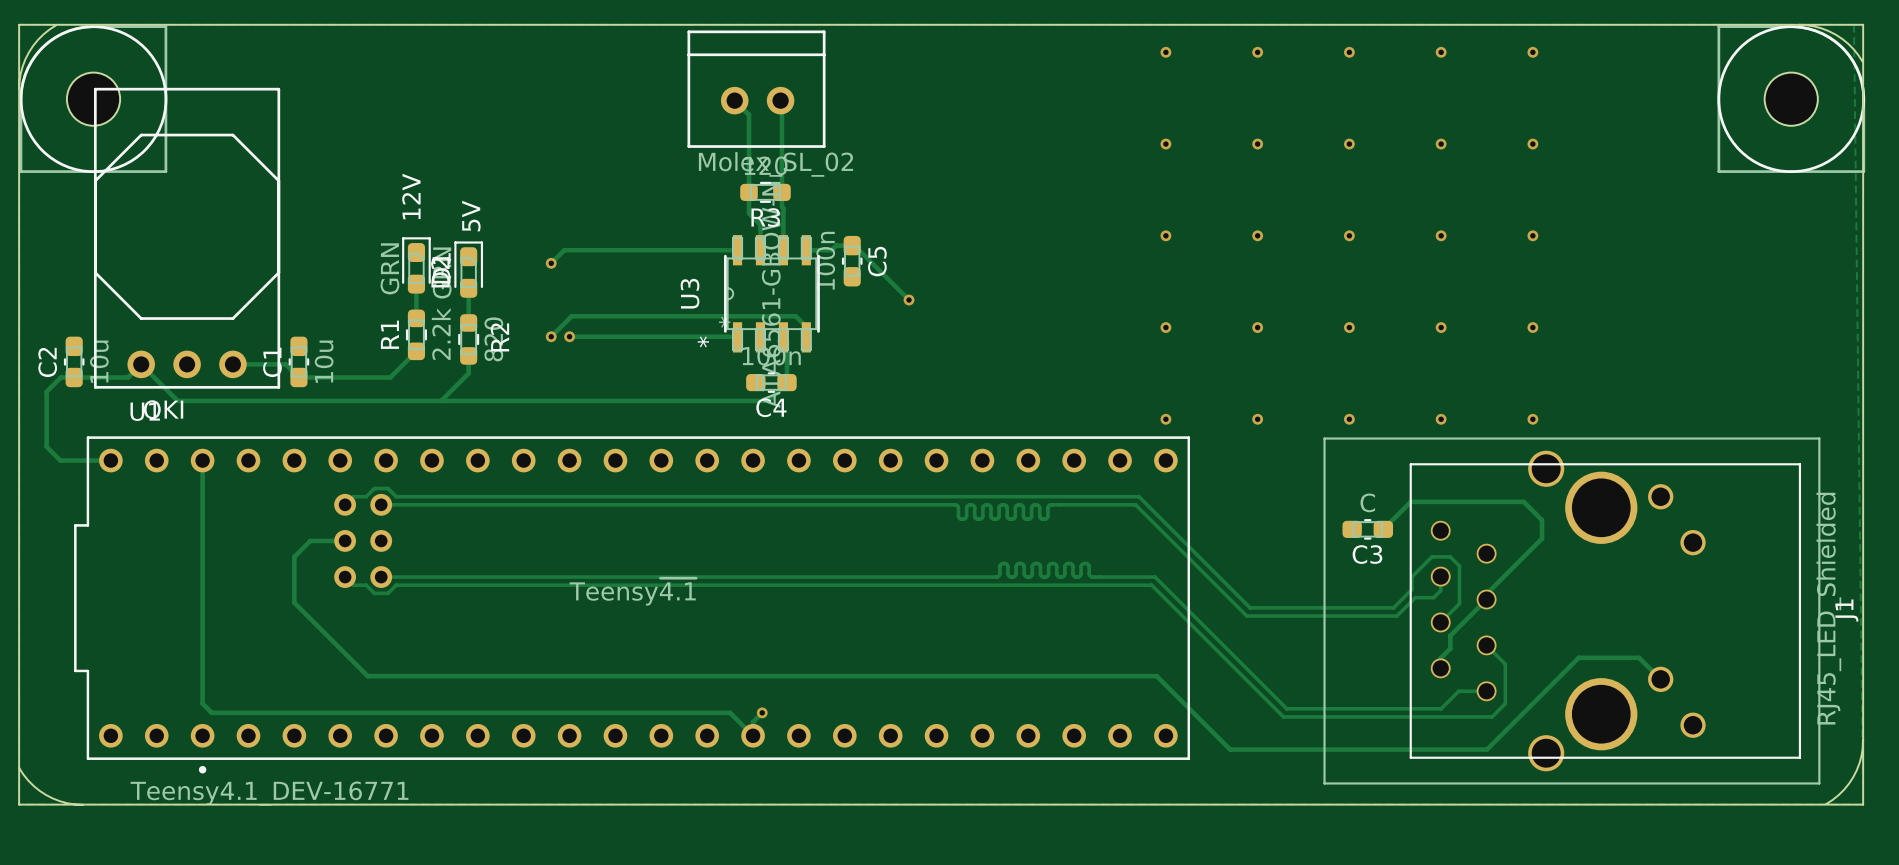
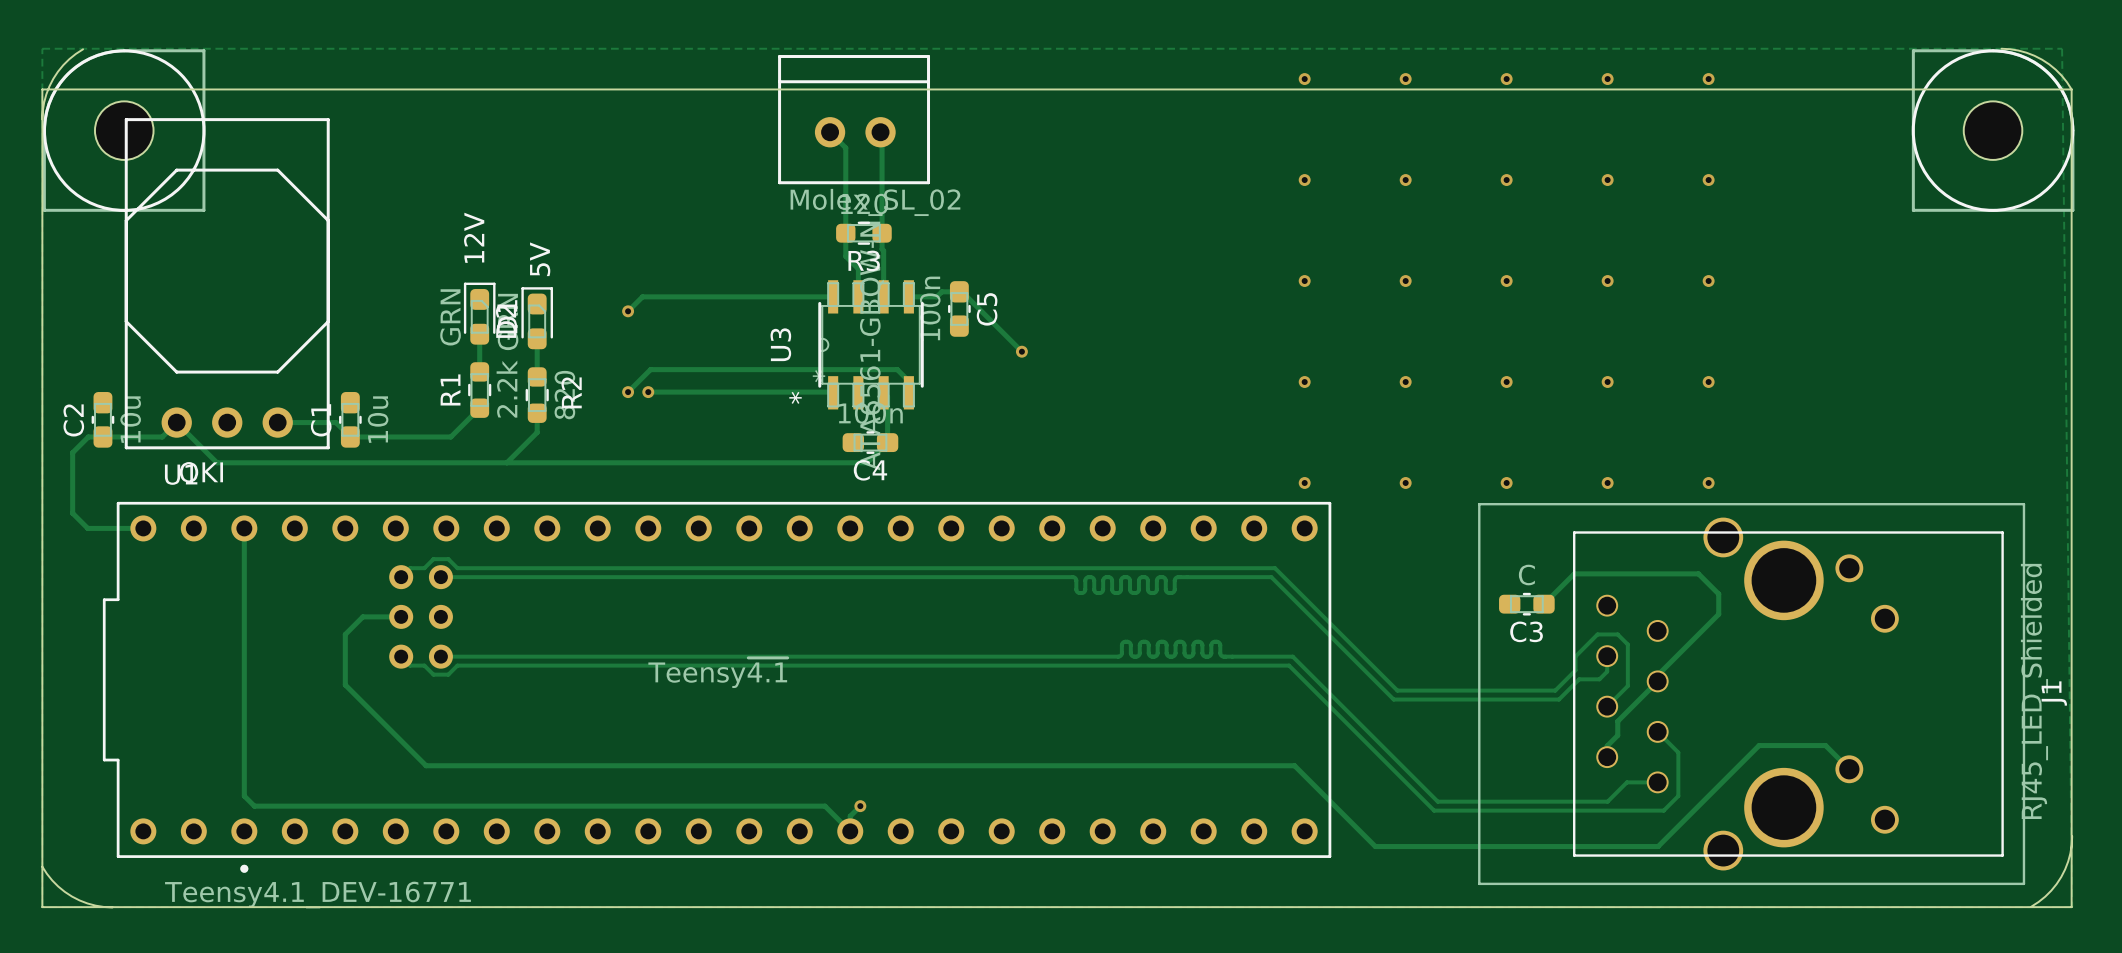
board edge: (19, 61) (19, 24) (1863, 24) (1862, 804) -> (42, 89) (2071, 89) (2071, 907)

